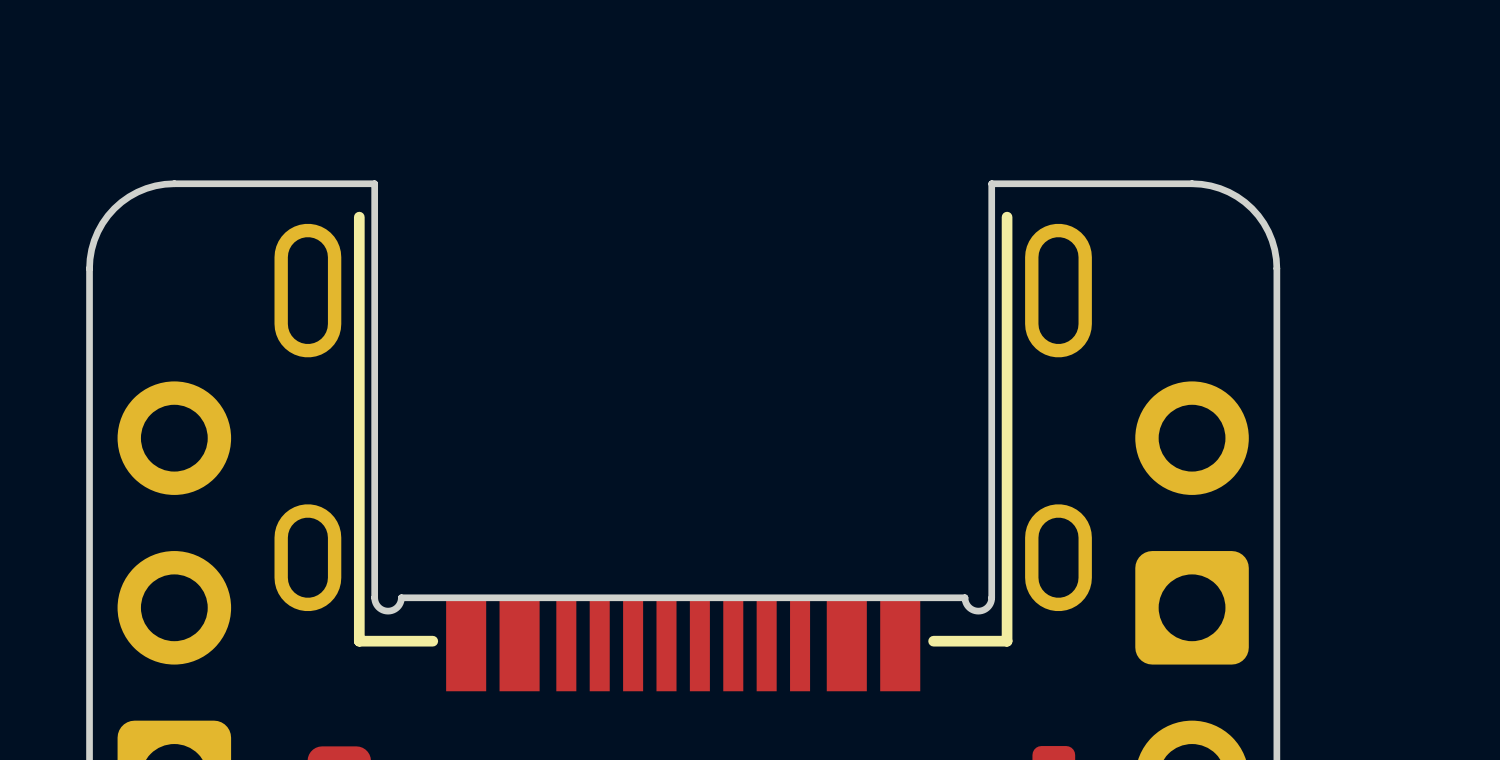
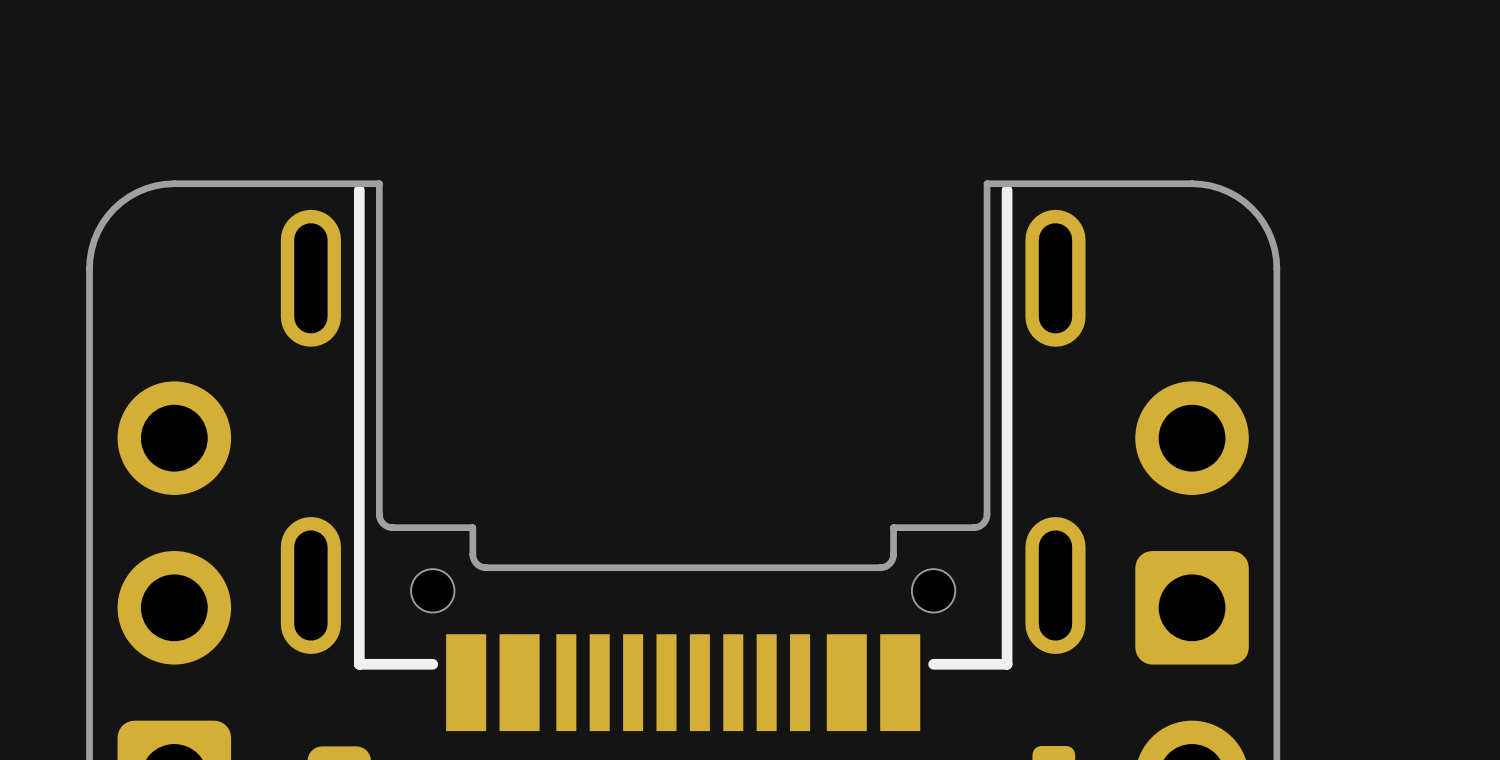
board edge: (374, 183) (374, 597) (379, 608) (386, 611) (393, 610) (398, 605) (401, 597) (965, 597) (969, 607) (978, 611) (988, 606) (991, 597) (991, 183) -> (374, 183) (379, 183) (379, 517) (383, 523) (390, 527) (472, 527) (473, 557) (478, 564) (486, 567) (881, 567) (889, 563) (893, 557) (893, 527) (973, 527) (981, 524) (987, 514) (987, 183) (991, 183)
part footprint: [274, 211, 1092, 692] -> [280, 184, 1086, 732]

